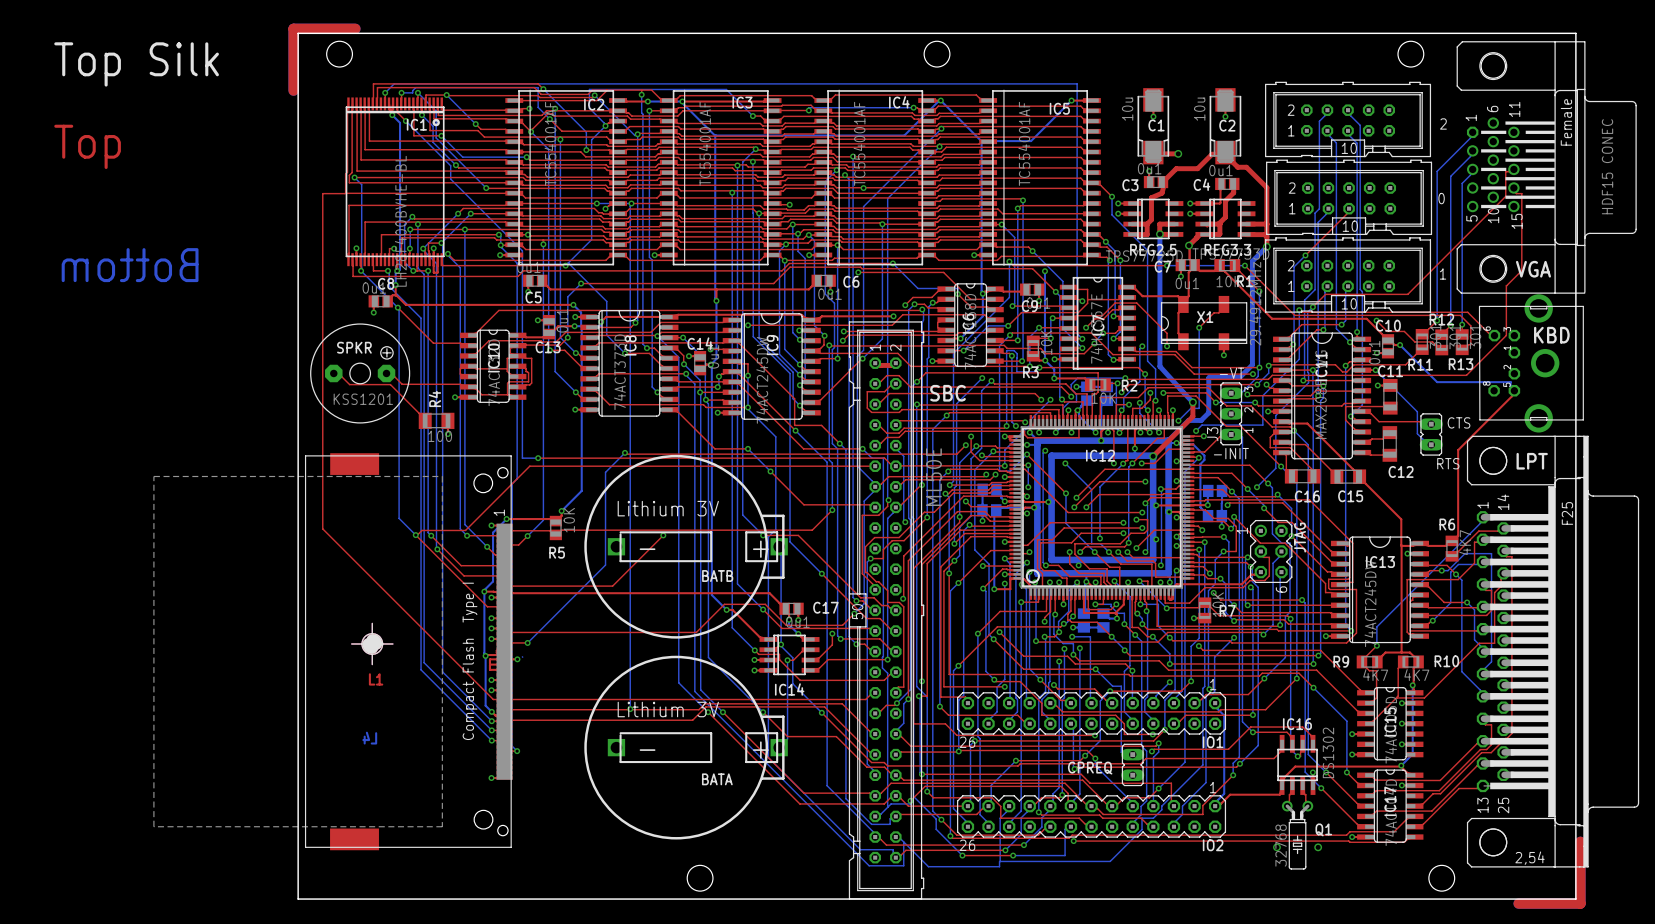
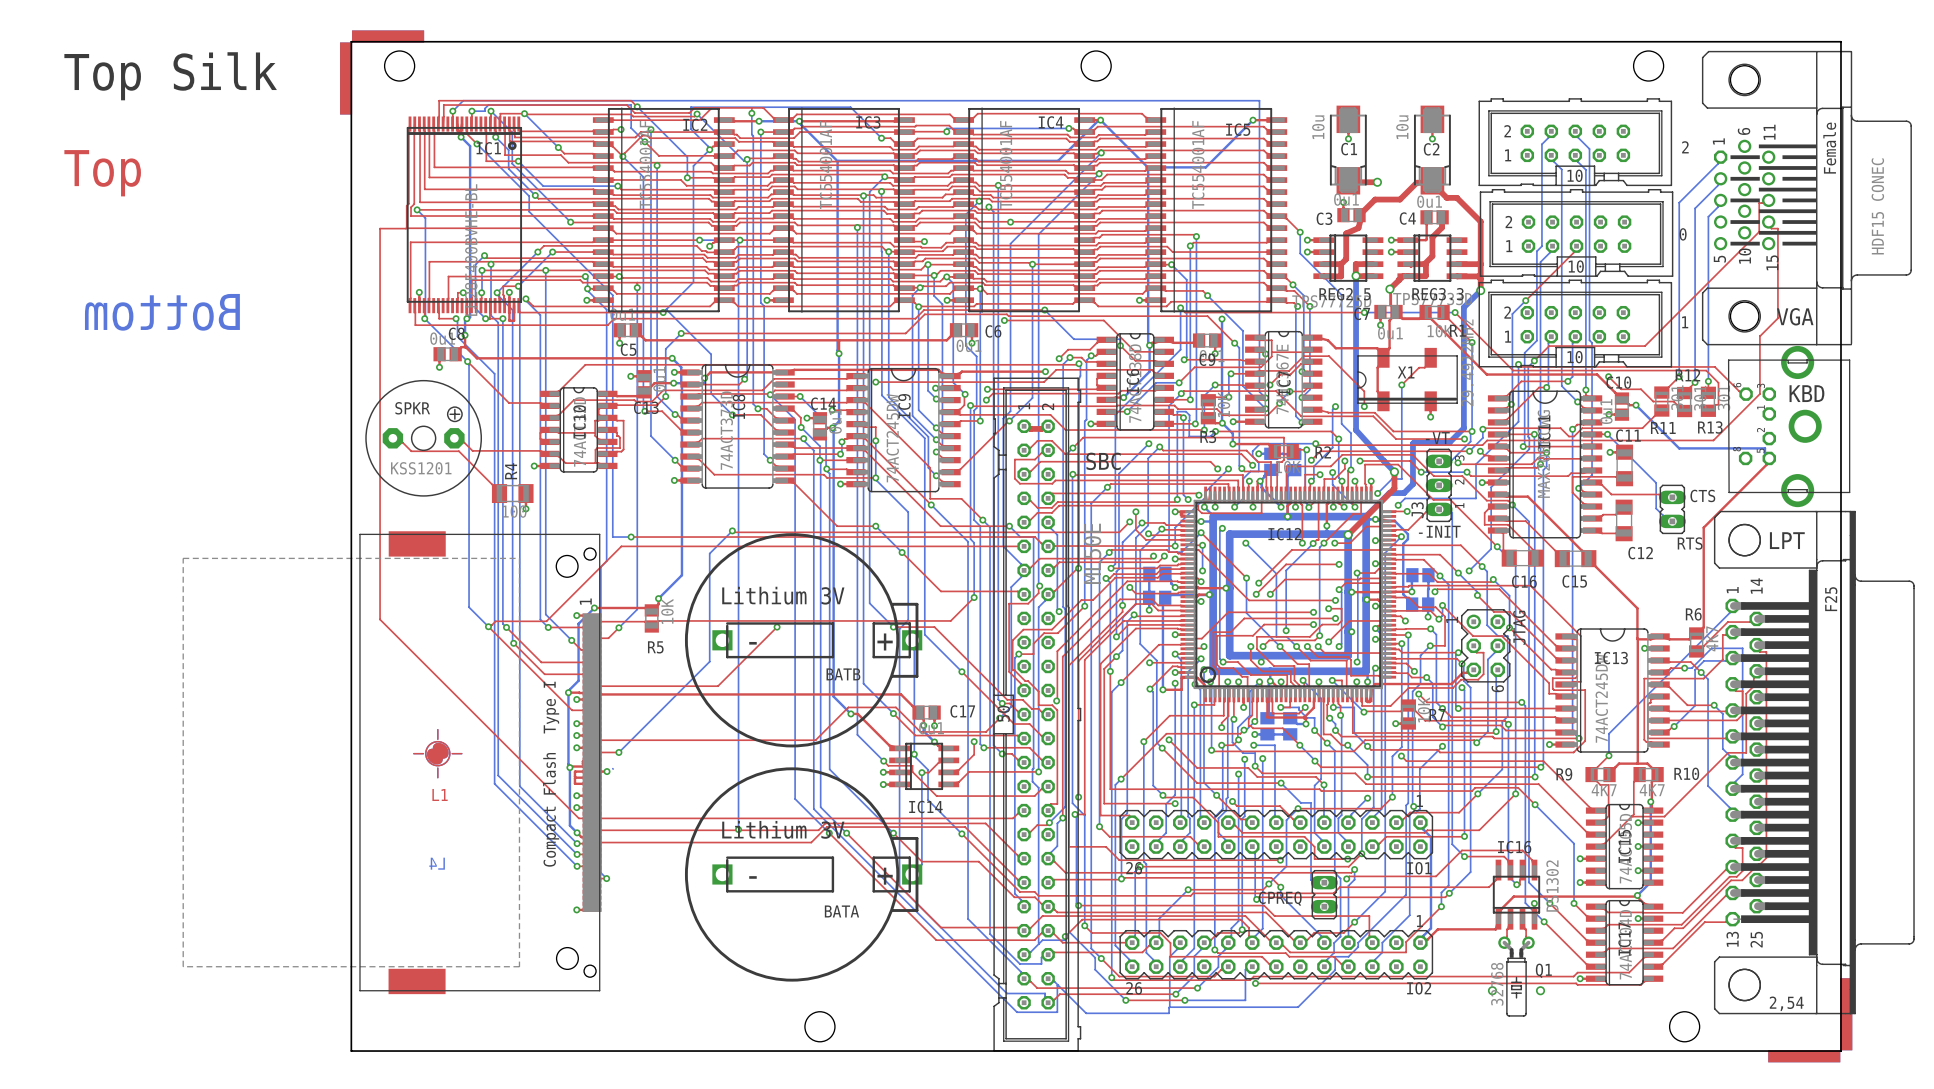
drawing shape: [288, 23, 361, 96] -> [340, 30, 425, 115]
IC7 footprint: [1059, 276, 1137, 370] -> [1245, 330, 1323, 429]
IC8 footprint: [580, 310, 679, 417] -> [680, 364, 795, 489]
IC9 footprint: [722, 313, 821, 420] -> [846, 367, 961, 493]
IC13 footprint: [1330, 536, 1430, 644] -> [1555, 628, 1670, 753]
drawing shape: [351, 622, 394, 666] -> [413, 728, 463, 779]
drawing shape: [1513, 836, 1586, 909] -> [1768, 978, 1853, 1063]

